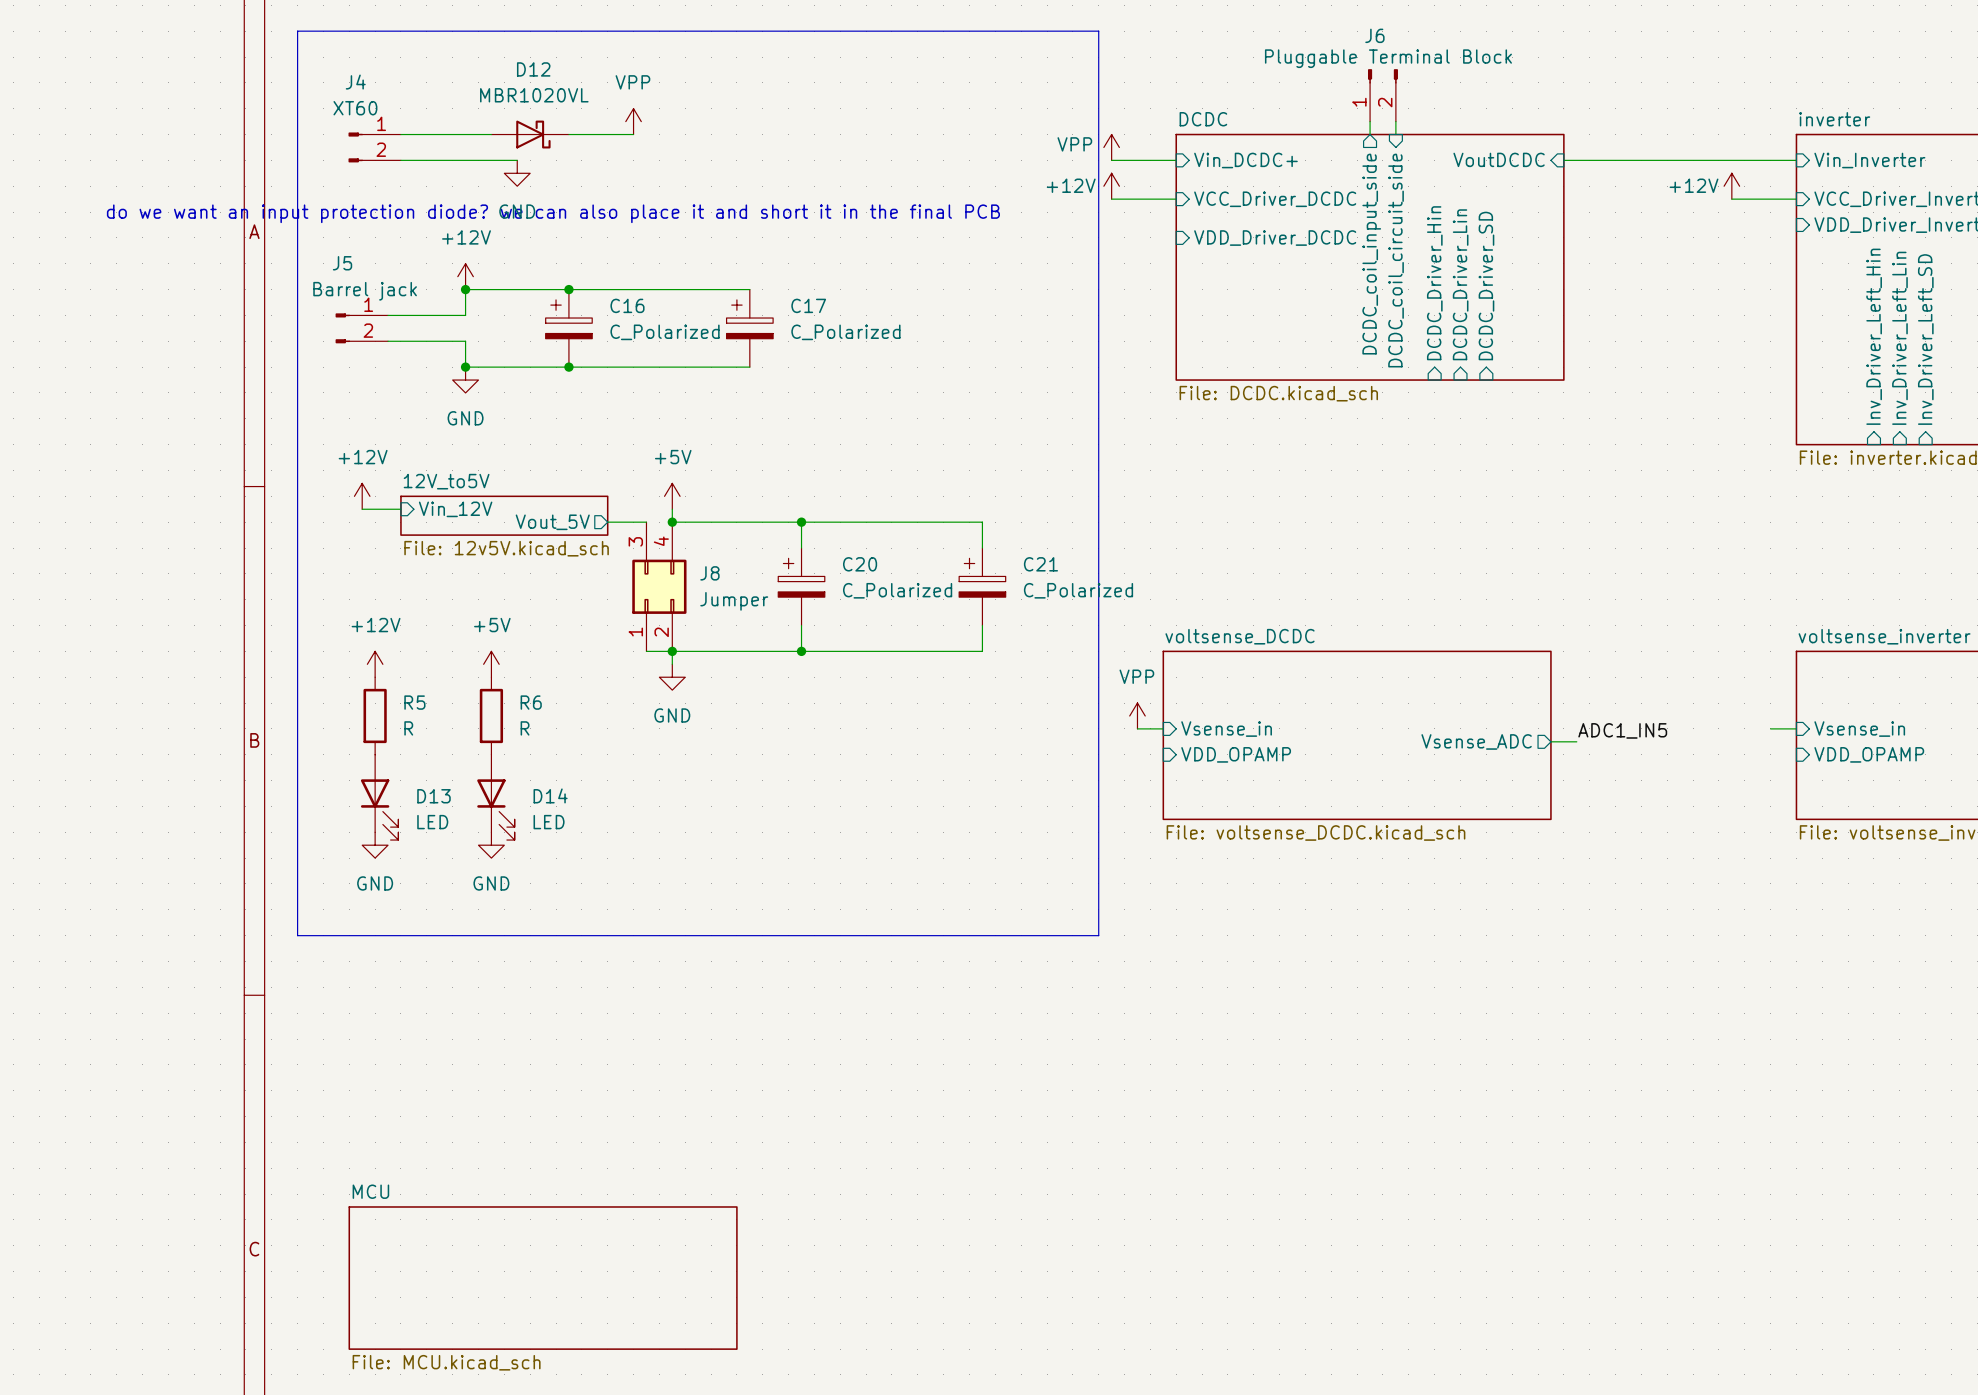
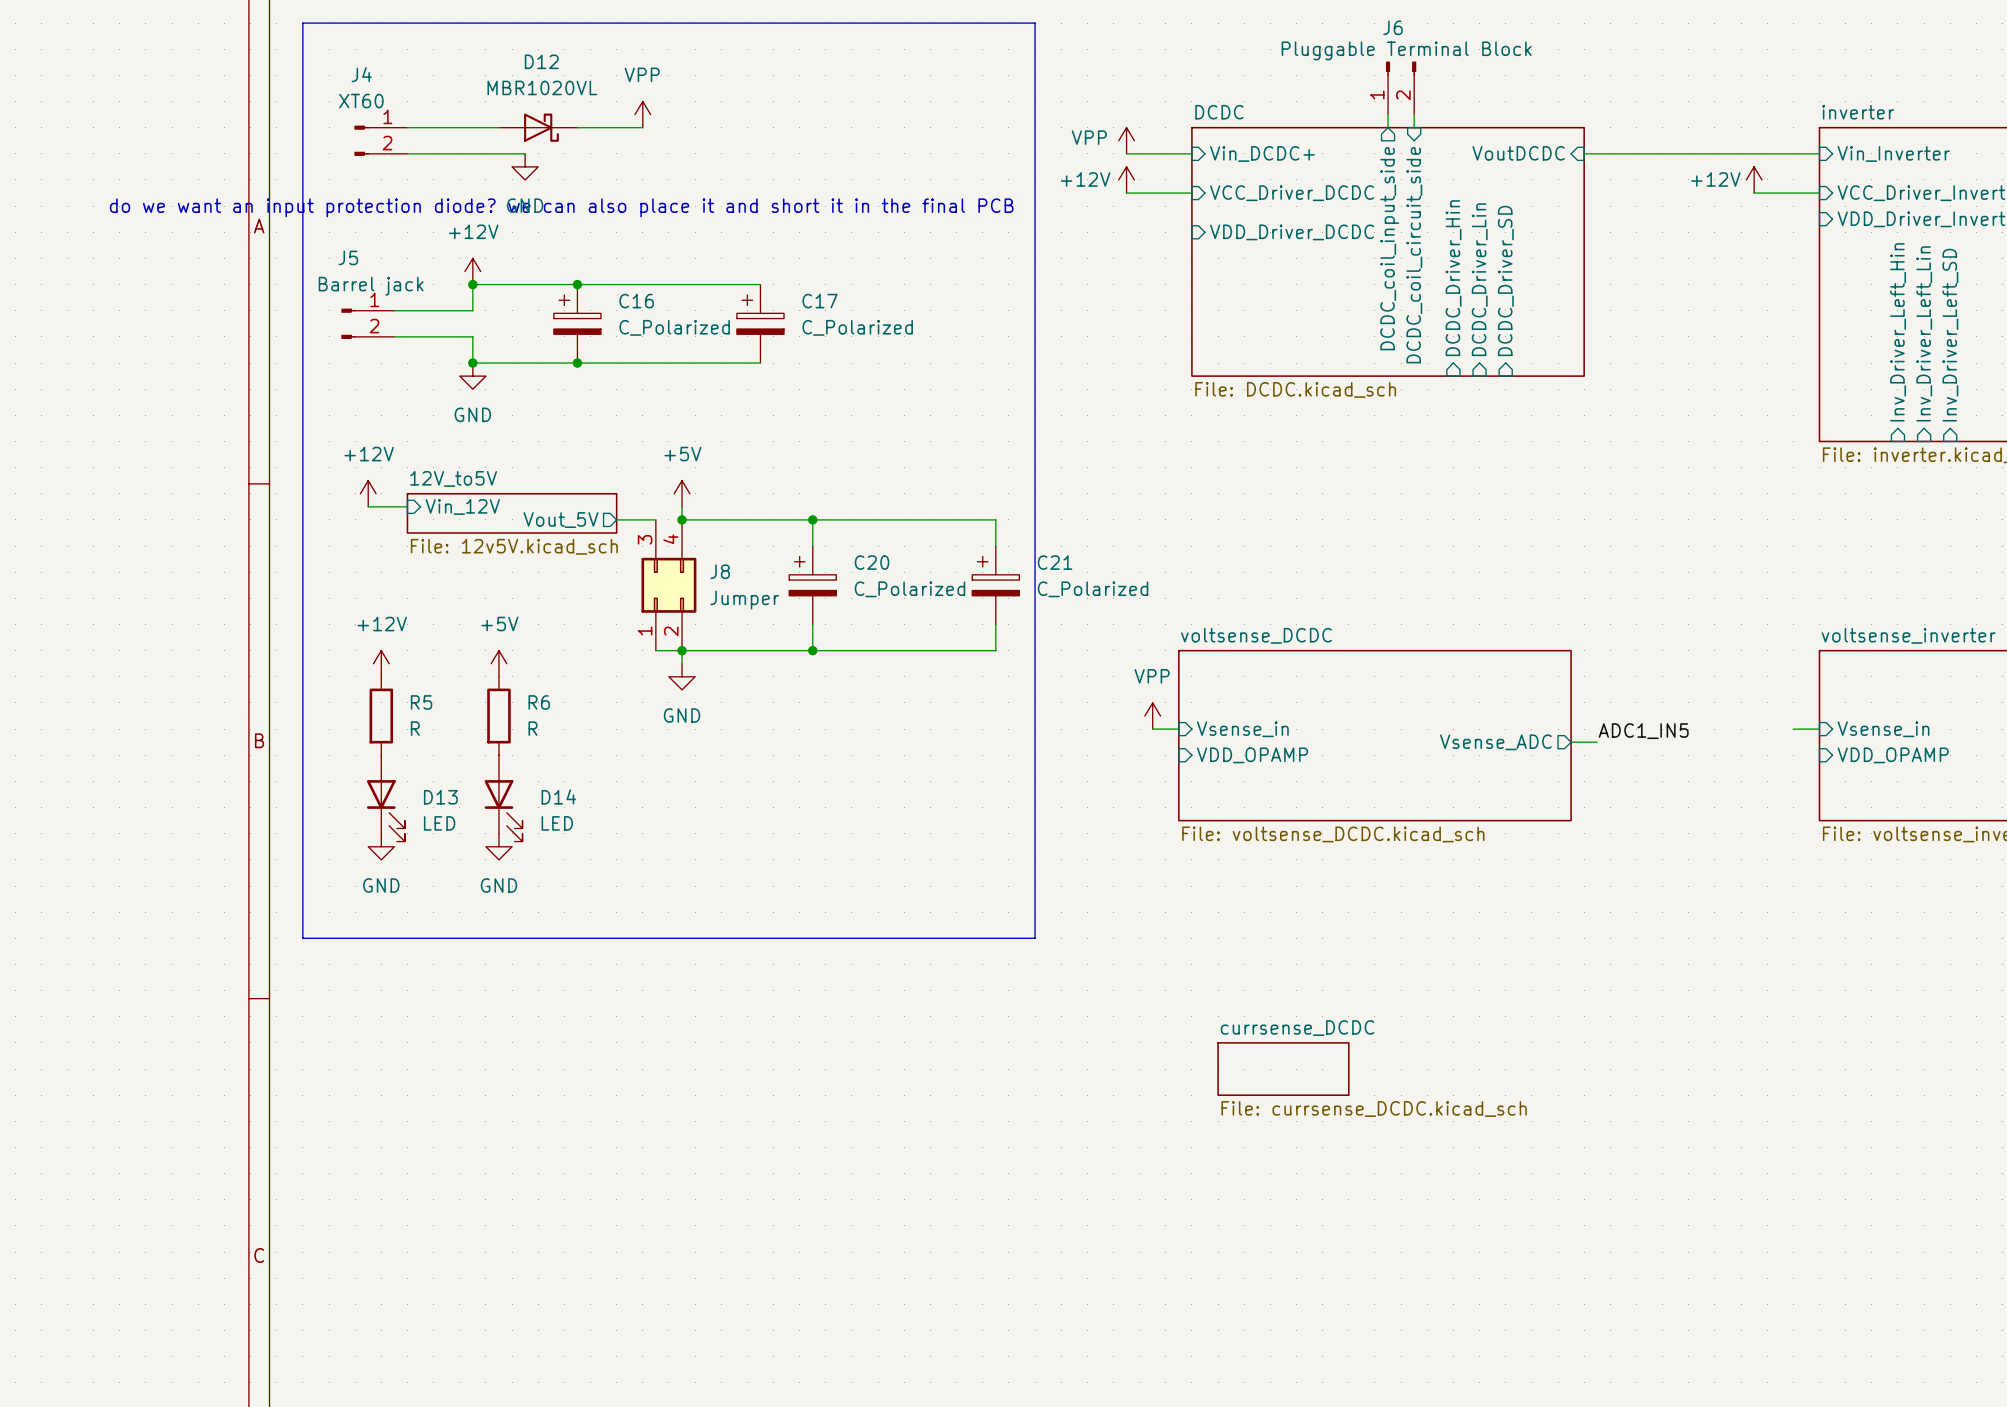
line: (1021, 31) (1098, 31) (1098, 935) (1021, 935) -> (1035, 23) (1035, 938)
sheet currsense_DCDC: none -> File: currsense_DCDC.kicad_sch (1283, 1069)
sheet MCU: File: MCU.kicad_sch (543, 1278) -> none

